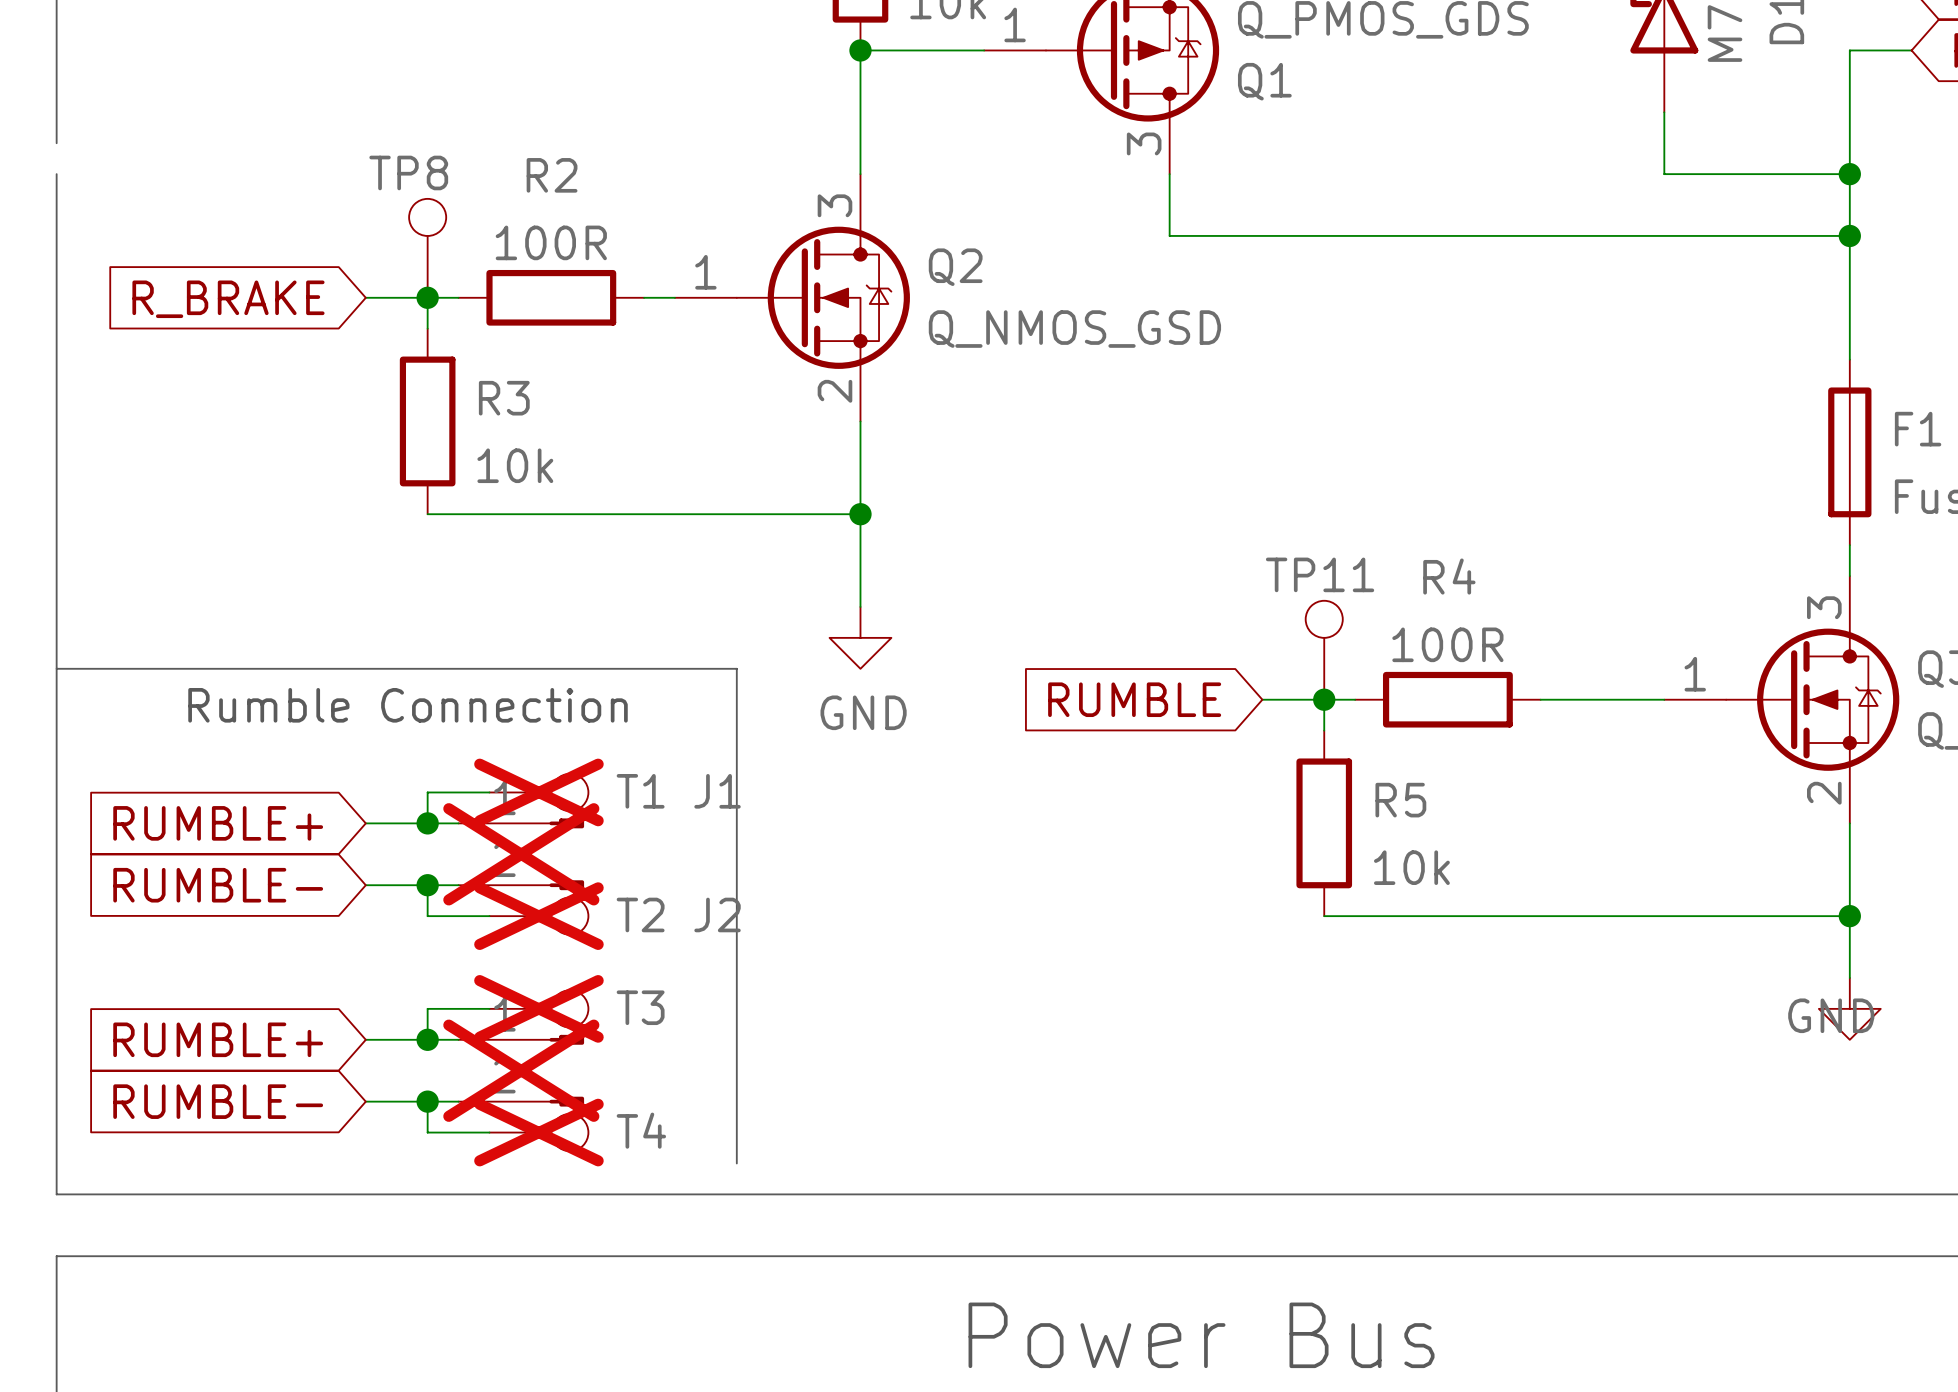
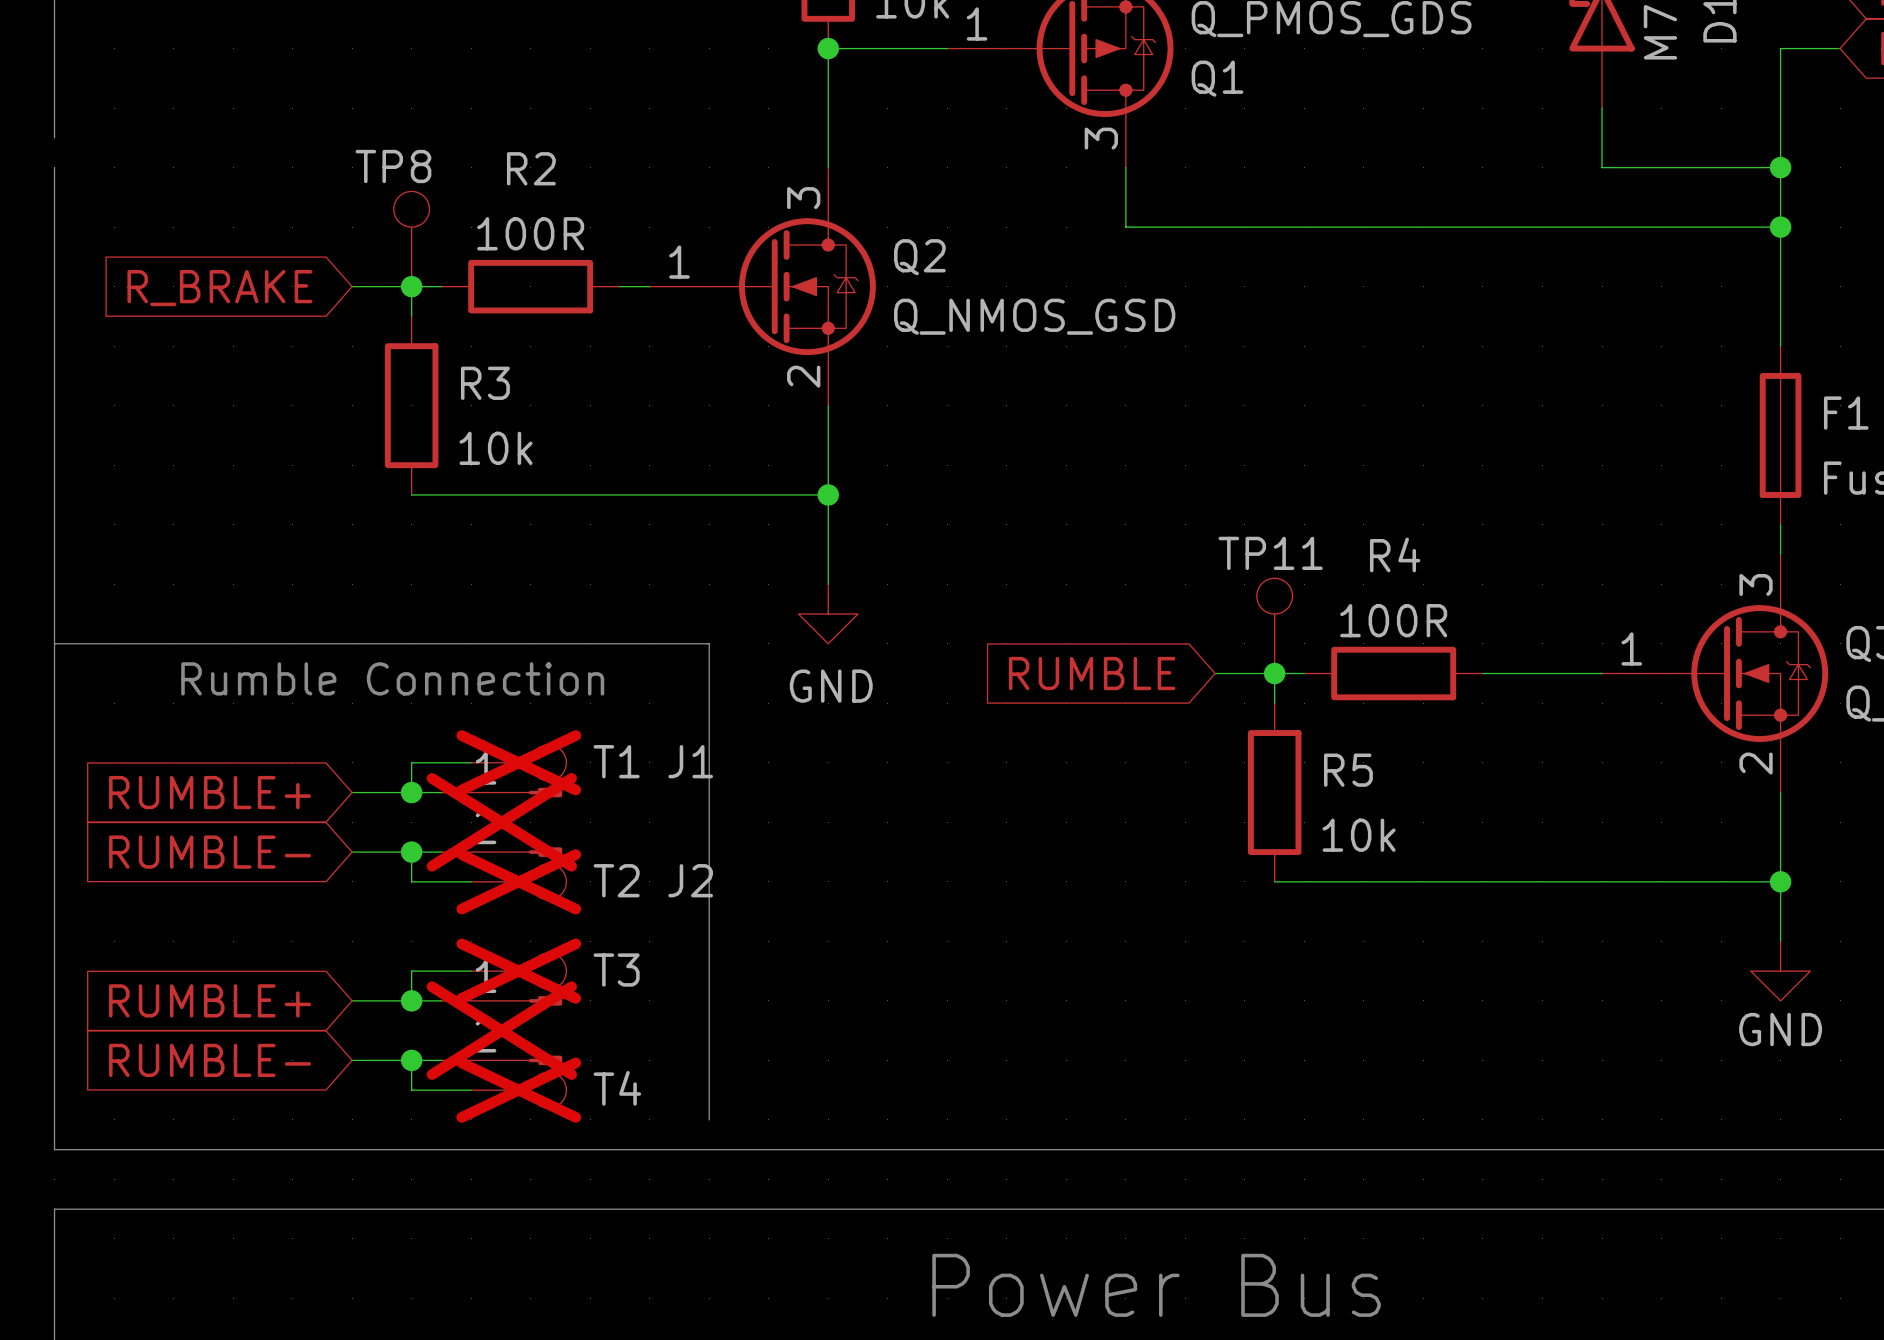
power symbol text position: GND (1831, 1015) -> GND (1780, 1029)

